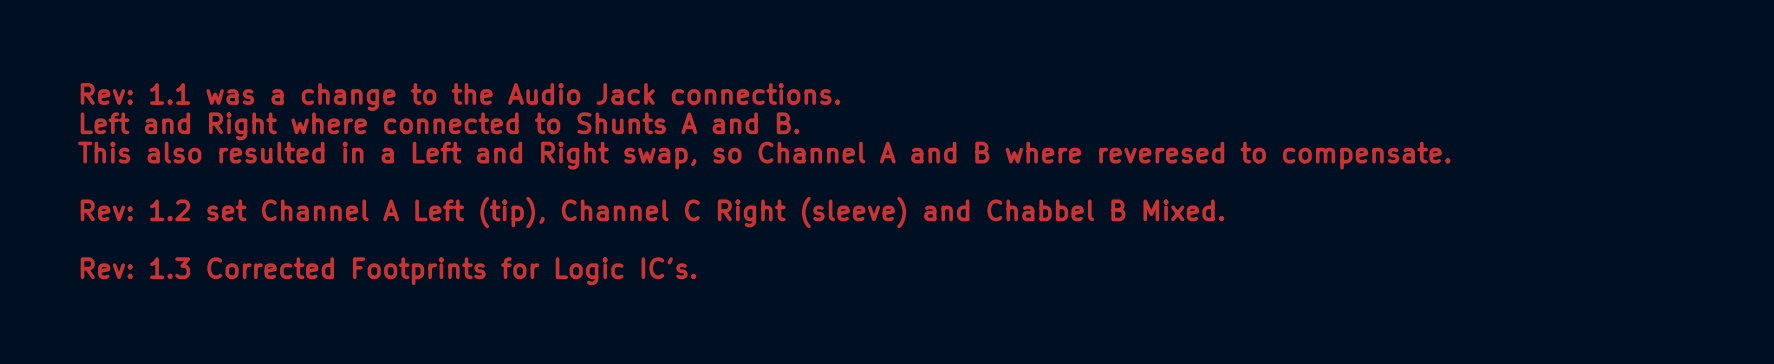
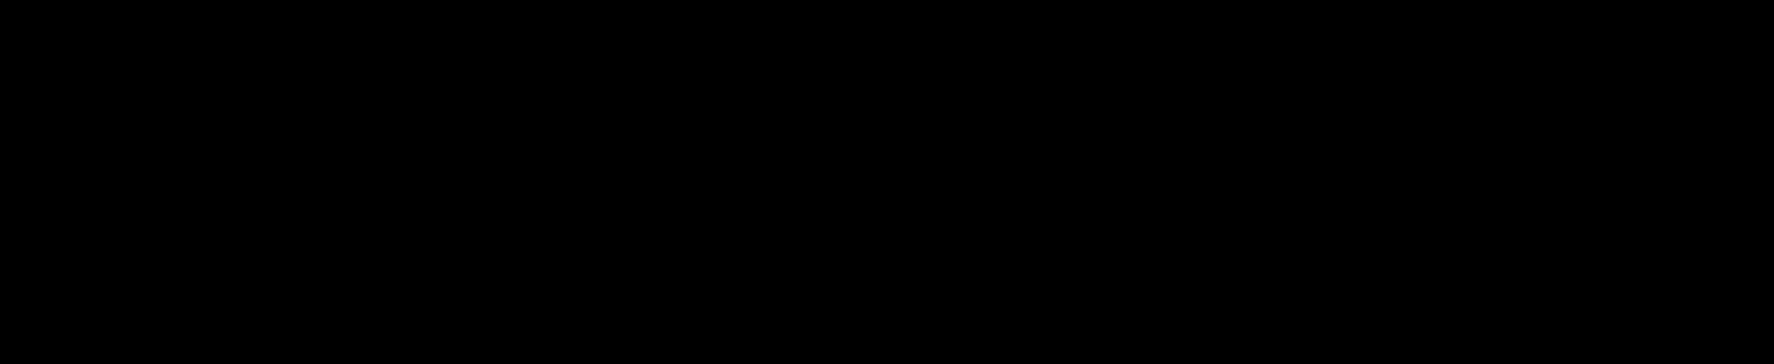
text: Rev: 1.1 was a change to the Audio Jack connections. (460, 97) -> none
text: Left and Right where connected to Shunts A and B. (440, 126) -> none
text: This also resulted in a Left and Right swap, so Channel A and B where reveresed to compensate. (764, 155) -> none
text: Rev: 1.2 set Channel A Left (tip), Channel C Right (sleeve) and Chabbel B Mixed. (652, 212) -> none
text: Rev: 1.3 Corrected Footprints for Logic IC's. (388, 271) -> none

